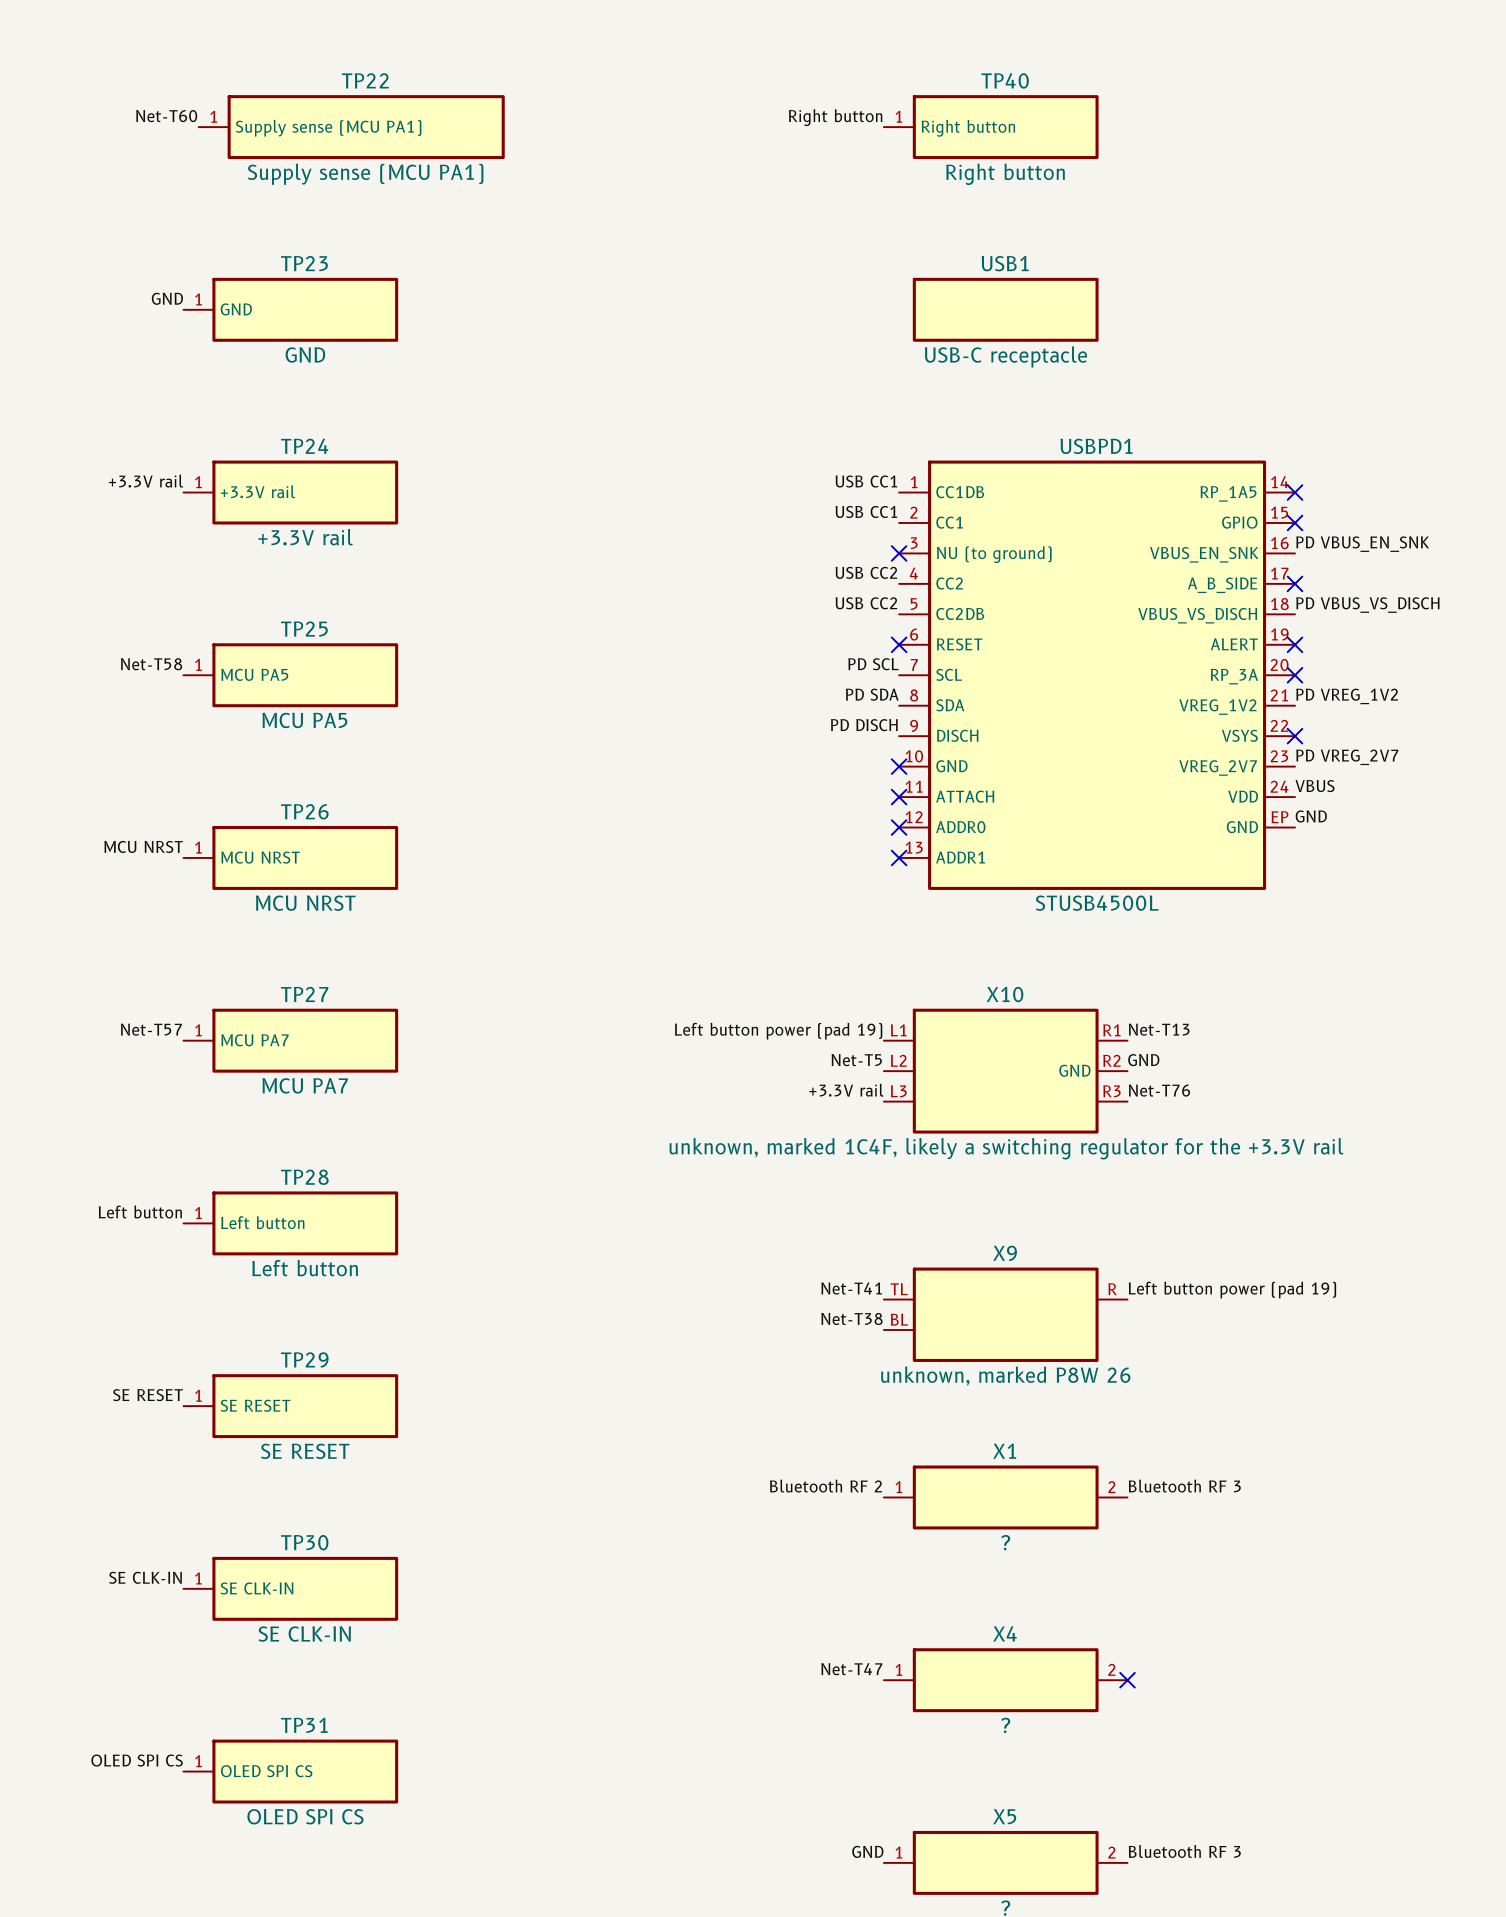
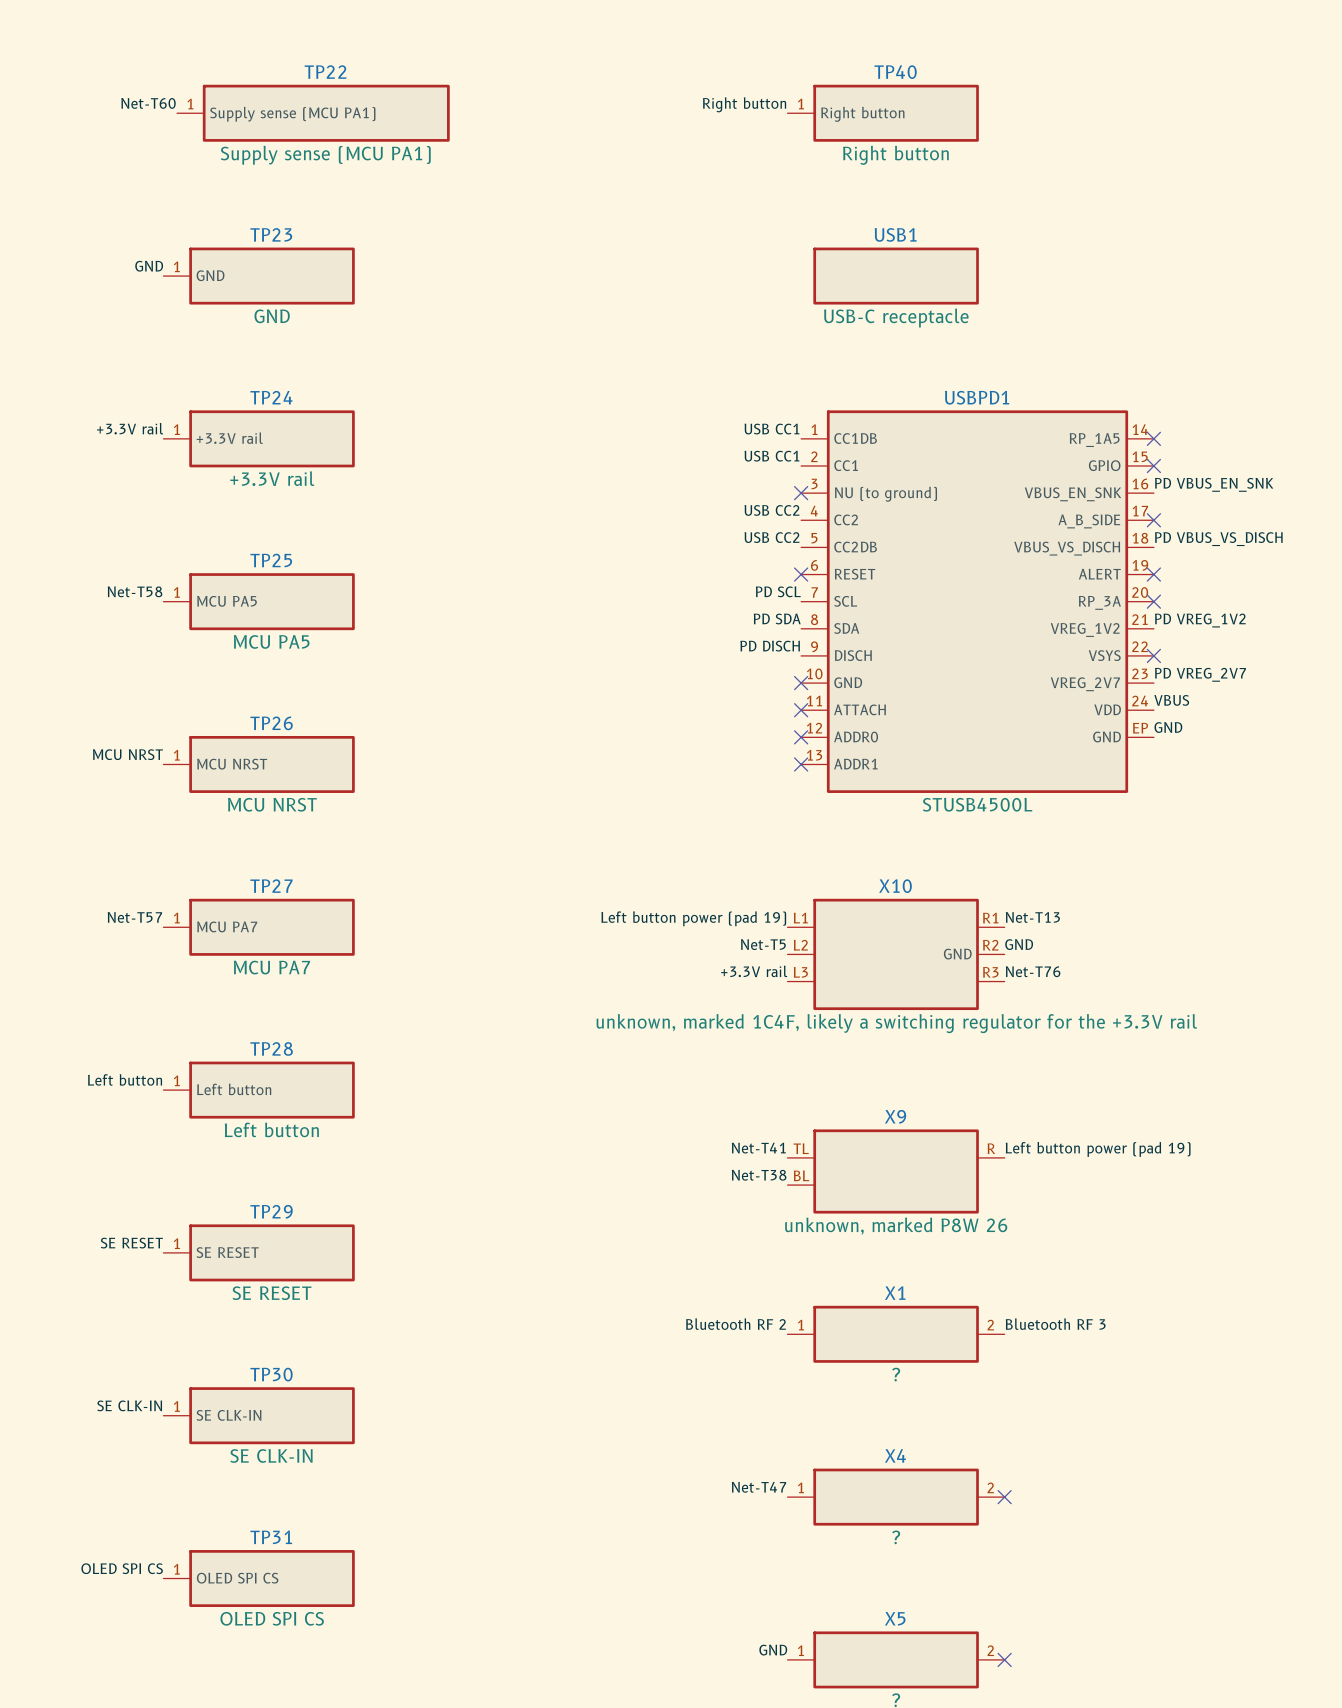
label: Bluetooth RF 3 (1184, 1851) -> none
no-connect mark: none -> (1004, 1659)

